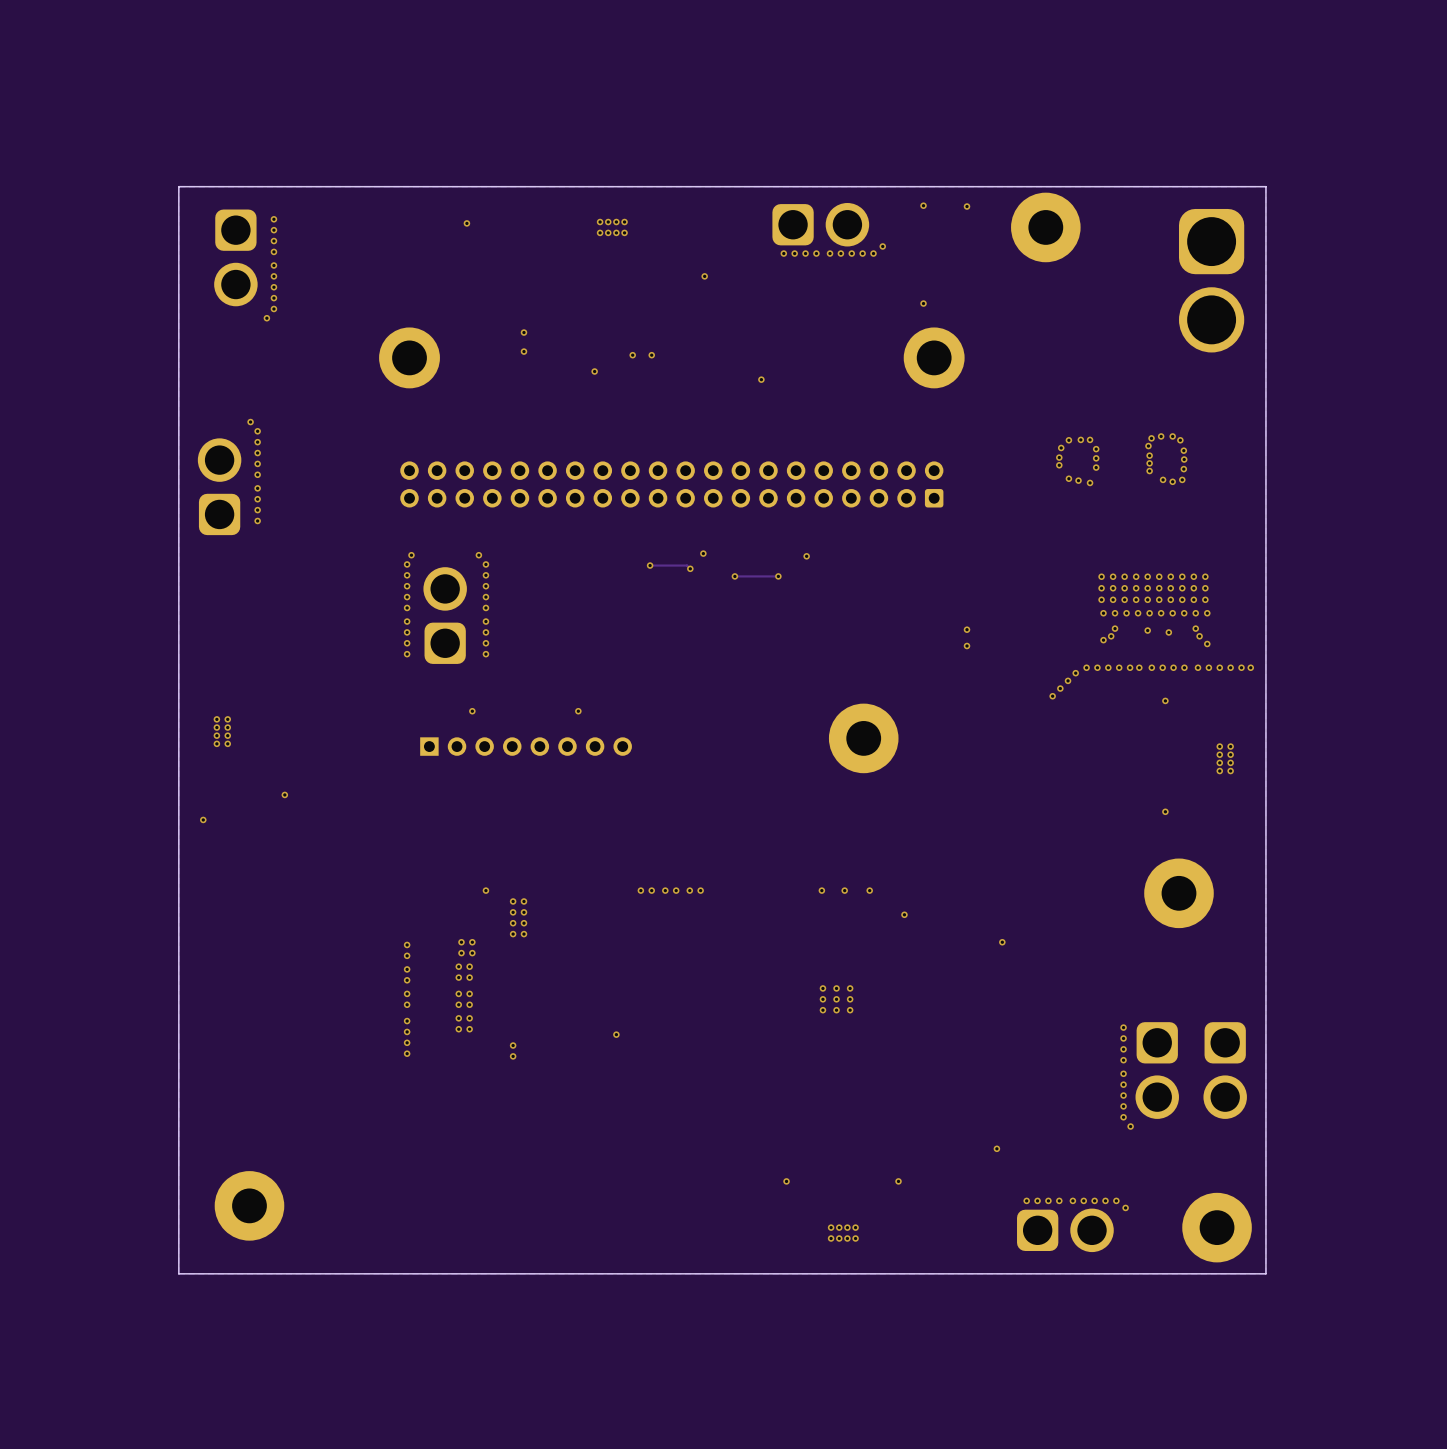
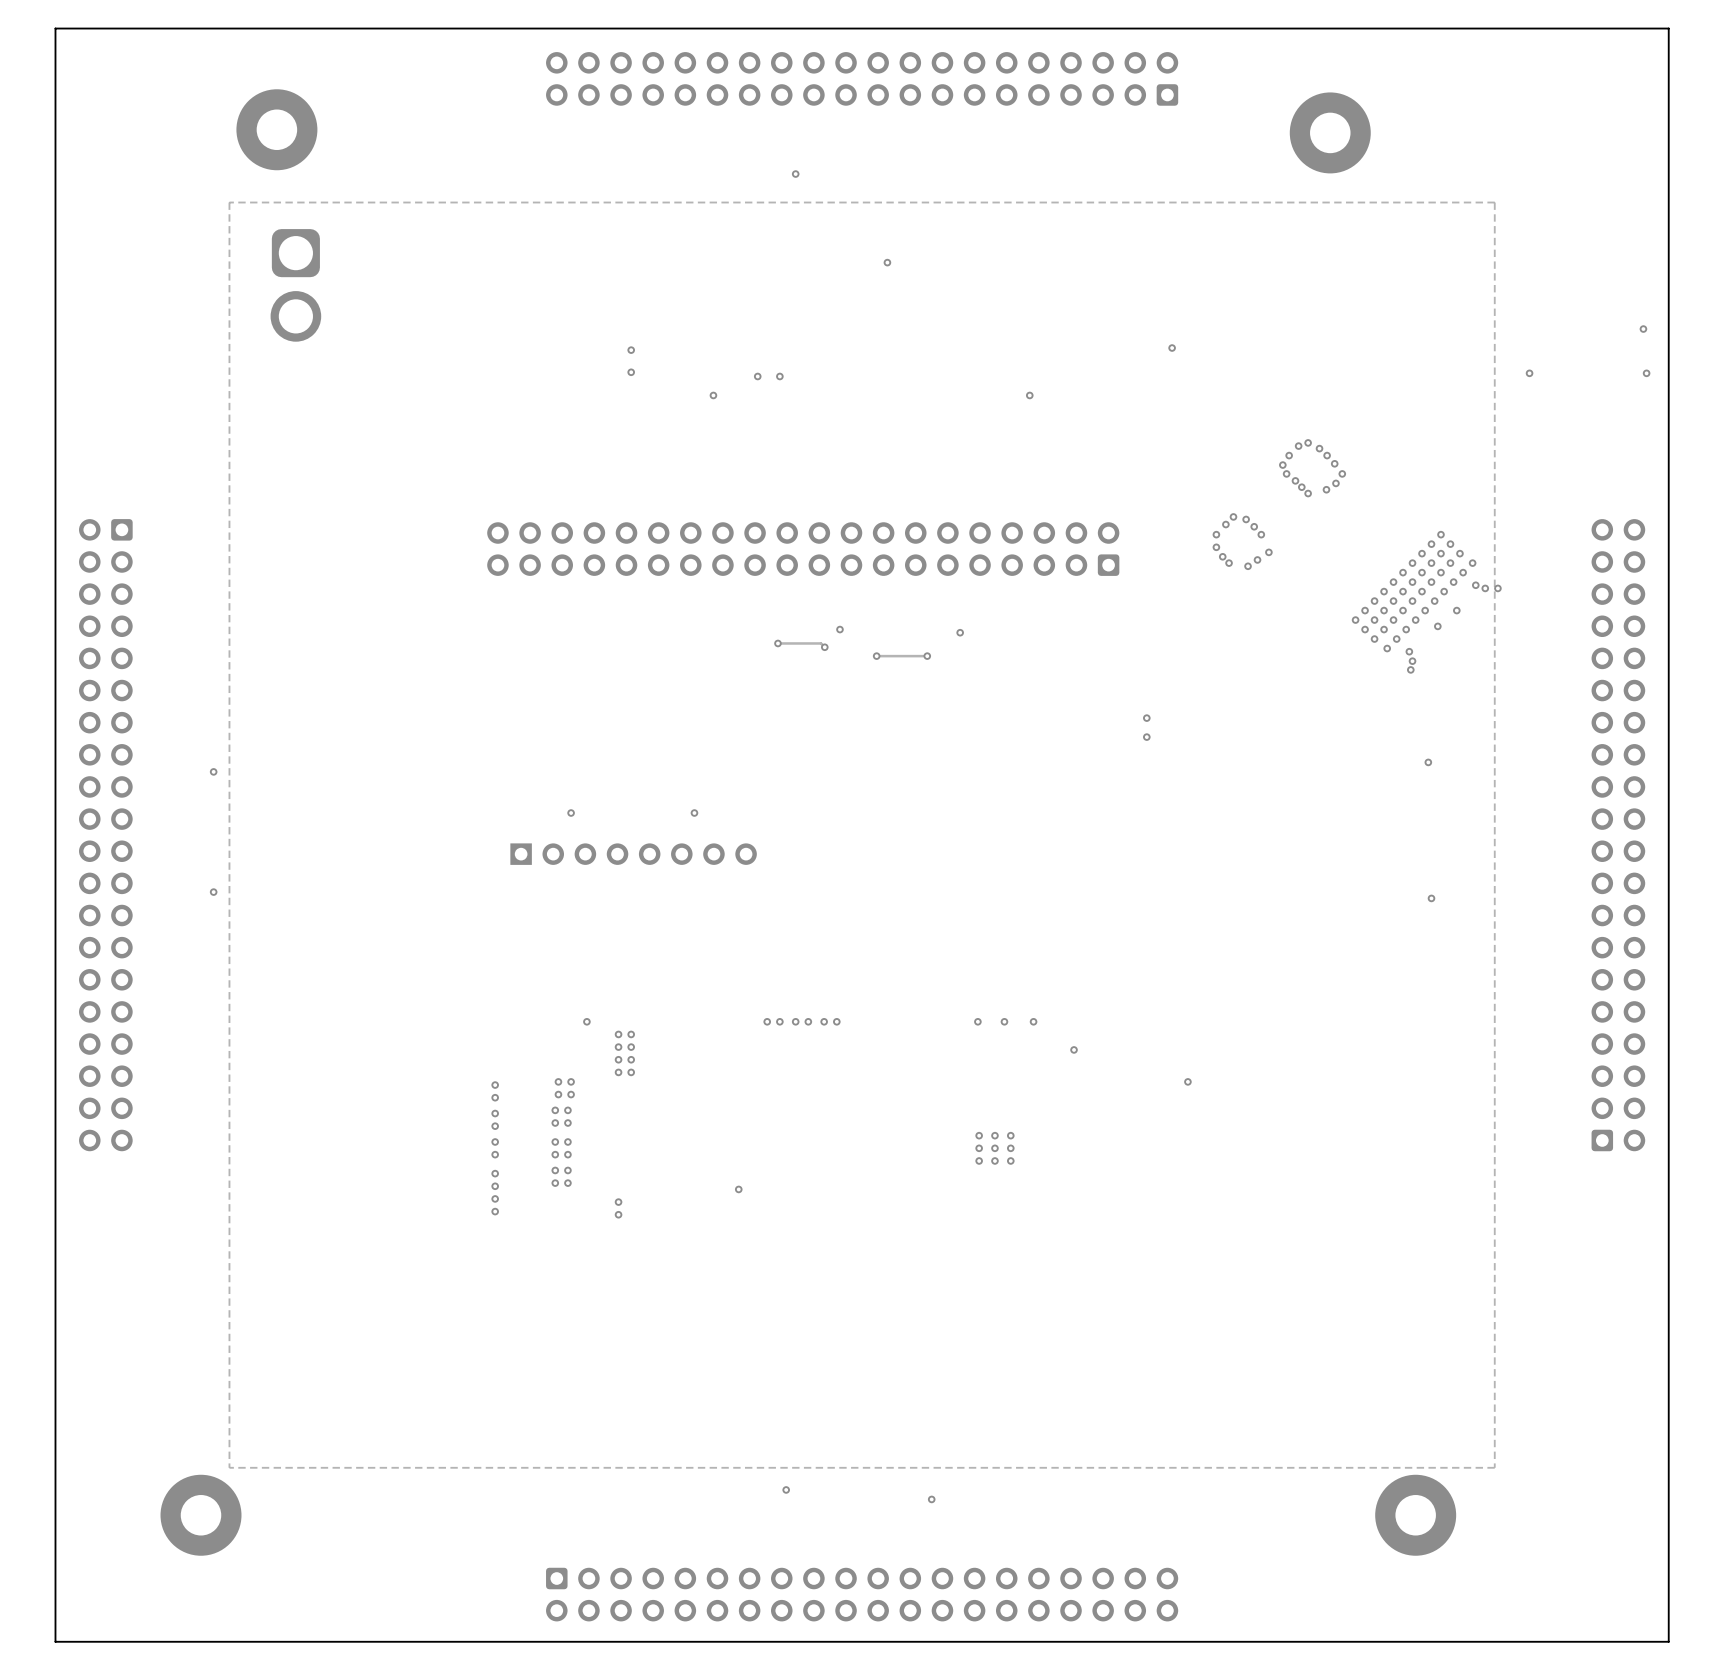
part: none -> (862, 78)
part: none -> (276, 129)
via: none -> (795, 174)
board edge: (1265, 186) (178, 186) (178, 1273) (1265, 1273) (1265, 186) -> (1668, 28) (1668, 1641) (55, 1641) (55, 28) (1668, 28)
via: (923, 205) -> none
via: (967, 206) -> none
via: (273, 219) -> none
via: (600, 222) -> none
via: (608, 222) -> none
via: (616, 222) -> none
via: (624, 222) -> none
via: (466, 223) -> none
part: (820, 224) -> none
part position: (1045, 227) -> (1330, 132)
via: (273, 230) -> none
via: (600, 232) -> none
via: (608, 232) -> none
via: (616, 232) -> none
via: (624, 232) -> none
via: none -> (887, 262)
via: (273, 241) -> none
via: (882, 246) -> none
via: (273, 251) -> none
via: (783, 253) -> none
via: (794, 253) -> none
via: (805, 253) -> none
via: (816, 253) -> none
via: (830, 253) -> none
via: (840, 253) -> none
via: (851, 253) -> none
via: (862, 253) -> none
via: (873, 253) -> none
via: (273, 265) -> none
via: (273, 276) -> none
via: (704, 276) -> none
part: (1211, 280) -> none
via: (273, 287) -> none
via: none -> (1643, 329)
via: (273, 298) -> none
via: (923, 303) -> none
via: (273, 308) -> none
via: none -> (1172, 348)
via: none -> (631, 350)
via: (266, 318) -> none
via: none -> (1529, 373)
via: none -> (1646, 373)
via: none -> (757, 376)
via: none -> (779, 376)
via: (523, 351) -> none
via: none -> (713, 395)
via: none -> (1029, 395)
via: (632, 355) -> none
via: (651, 355) -> none
part: (409, 357) -> none
part: (934, 357) -> none
via: (594, 371) -> none
via: (761, 379) -> none
via: none -> (1308, 442)
via: none -> (1298, 446)
via: none -> (1319, 448)
via: none -> (1289, 455)
via: none -> (1327, 455)
via: none -> (1334, 463)
via: none -> (1282, 465)
via: none -> (1286, 473)
via: none -> (1342, 473)
via: (250, 422) -> none
via: none -> (1295, 480)
via: none -> (1335, 483)
via: (257, 431) -> none
via: none -> (1301, 487)
via: none -> (1326, 489)
via: none -> (1308, 493)
via: (1161, 436) -> none
via: (1172, 436) -> none
via: (1151, 438) -> none
via: (1080, 439) -> none
via: (1090, 439) -> none
via: (1068, 440) -> none
via: (1180, 440) -> none
via: (257, 442) -> none
via: (1148, 446) -> none
via: (1061, 447) -> none
via: (1096, 449) -> none
via: (1183, 450) -> none
via: (257, 453) -> none
via: (1149, 455) -> none
via: none -> (1233, 516)
via: (1059, 457) -> none
via: (1096, 458) -> none
via: none -> (1246, 519)
via: (1184, 459) -> none
via: (257, 463) -> none
via: none -> (1225, 524)
via: (1149, 463) -> none
via: (1096, 467) -> none
via: (1183, 469) -> none
via: (1149, 471) -> none
via: none -> (1216, 534)
via: none -> (1261, 534)
via: none -> (1440, 534)
via: (257, 474) -> none
via: (1068, 478) -> none
via: (1163, 479) -> none
via: (1182, 479) -> none
via: (1078, 480) -> none
via: none -> (1431, 544)
via: none -> (1450, 544)
via: (1172, 481) -> none
via: none -> (1216, 547)
via: (1090, 482) -> none
part: (219, 486) -> none
via: none -> (1268, 552)
via: (257, 488) -> none
via: none -> (1422, 553)
via: none -> (1440, 553)
via: none -> (1459, 553)
via: none -> (1222, 556)
via: none -> (1257, 559)
via: none -> (1229, 563)
via: none -> (1412, 563)
via: none -> (1431, 563)
via: none -> (1450, 563)
via: none -> (1472, 563)
via: (257, 499) -> none
via: none -> (1248, 566)
via: none -> (1403, 572)
via: none -> (1422, 572)
via: none -> (1440, 572)
via: none -> (1463, 572)
via: (257, 510) -> none
via: none -> (1393, 582)
via: none -> (1412, 582)
via: none -> (1431, 582)
via: none -> (1453, 582)
via: none -> (1475, 585)
via: none -> (1485, 588)
via: none -> (1497, 588)
via: (257, 520) -> none
via: none -> (1384, 591)
via: none -> (1403, 591)
via: none -> (1422, 591)
via: none -> (1444, 591)
via: none -> (1374, 601)
via: none -> (1393, 601)
via: none -> (1412, 601)
via: none -> (1434, 601)
via: none -> (1365, 610)
via: none -> (1384, 610)
via: none -> (1403, 610)
via: none -> (1425, 610)
via: none -> (1456, 610)
via: none -> (1355, 620)
via: none -> (1374, 620)
via: none -> (1393, 620)
via: none -> (1415, 620)
via: none -> (1437, 626)
via: none -> (1365, 629)
via: none -> (1384, 629)
via: none -> (1406, 629)
via: (411, 555) -> none
via: (478, 555) -> none
via: none -> (1374, 639)
via: none -> (1396, 639)
via: (407, 564) -> none
via: (485, 564) -> none
via: none -> (1387, 648)
via: none -> (1409, 651)
via: (407, 575) -> none
via: (485, 575) -> none
via: (1101, 576) -> none
via: (1113, 576) -> none
via: (1124, 576) -> none
via: (1136, 576) -> none
via: (1147, 576) -> none
via: (1159, 576) -> none
via: (1170, 576) -> none
via: (1182, 576) -> none
via: (1193, 576) -> none
via: (1205, 576) -> none
via: none -> (1412, 661)
via: (407, 586) -> none
via: (485, 586) -> none
via: (1101, 588) -> none
via: (1113, 588) -> none
via: (1124, 588) -> none
via: (1136, 588) -> none
via: (1147, 588) -> none
via: (1159, 588) -> none
via: (1170, 588) -> none
via: (1182, 588) -> none
via: (1205, 588) -> none
via: (407, 597) -> none
via: (485, 597) -> none
via: (1101, 599) -> none
via: (1113, 599) -> none
via: (1124, 599) -> none
via: (1136, 599) -> none
via: (1147, 599) -> none
via: (1159, 599) -> none
via: (1170, 599) -> none
via: (1182, 599) -> none
via: (1193, 599) -> none
via: (1205, 599) -> none
via: (407, 607) -> none
via: (485, 607) -> none
via: (1103, 613) -> none
via: (1115, 613) -> none
via: (1126, 613) -> none
via: (1138, 613) -> none
via: (1149, 613) -> none
via: (1161, 613) -> none
via: (1172, 613) -> none
via: (1184, 613) -> none
via: (1195, 613) -> none
via: (1207, 613) -> none
part: (445, 615) -> none
via: (407, 621) -> none
via: (485, 621) -> none
via: (1115, 628) -> none
via: (1195, 628) -> none
via: (1147, 630) -> none
via: (407, 632) -> none
via: (485, 632) -> none
via: (1168, 632) -> none
via: (1111, 636) -> none
via: (1199, 636) -> none
via: (1103, 640) -> none
via: (407, 643) -> none
via: (485, 643) -> none
via: (1207, 644) -> none
via: (407, 654) -> none
via: (485, 654) -> none
via: (1086, 667) -> none
via: (1097, 667) -> none
via: (1108, 667) -> none
via: (1119, 667) -> none
via: (1130, 667) -> none
via: (1139, 667) -> none
via: (1151, 667) -> none
via: (1162, 667) -> none
via: (1173, 667) -> none
via: (1184, 667) -> none
via: (1198, 667) -> none
via: (1219, 667) -> none
via: (1230, 667) -> none
via: (1241, 667) -> none
via: (1250, 667) -> none
via: (1075, 673) -> none
via: none -> (213, 771)
via: (1068, 680) -> none
via: (1060, 688) -> none
via: (1052, 696) -> none
via: (1165, 700) -> none
via: (216, 719) -> none
via: (227, 719) -> none
via: (216, 727) -> none
via: (227, 727) -> none
part: none -> (105, 835)
part: none -> (1618, 835)
via: (216, 735) -> none
via: (227, 735) -> none
part: (863, 738) -> none
via: (216, 743) -> none
via: (227, 743) -> none
via: (1219, 746) -> none
via: (1230, 746) -> none
via: (1219, 754) -> none
via: (1230, 754) -> none
via: (1219, 762) -> none
via: (1230, 762) -> none
via: (1219, 771) -> none
via: (1230, 771) -> none
via: none -> (213, 892)
via: none -> (1431, 898)
via: (284, 794) -> none
via: (1165, 811) -> none
via: (203, 819) -> none
part: (1178, 893) -> none
via: (1123, 1027) -> none
via: (1123, 1038) -> none
via: (1123, 1049) -> none
via: (1123, 1060) -> none
part: (1157, 1070) -> none
part: (1225, 1070) -> none
via: (1123, 1073) -> none
via: (1123, 1084) -> none
via: (1123, 1095) -> none
via: (1123, 1106) -> none
via: (1123, 1117) -> none
via: (1130, 1126) -> none
via: (996, 1148) -> none
via: (786, 1181) -> none
via: (898, 1181) -> none
via: (1026, 1200) -> none
via: (1037, 1200) -> none
via: (1048, 1200) -> none
via: (1059, 1200) -> none
via: (1072, 1200) -> none
via: (1083, 1200) -> none
via: (1094, 1200) -> none
via: (1105, 1200) -> none
via: (1116, 1200) -> none
part position: (249, 1205) -> (200, 1515)
via: (1125, 1207) -> none
via: (831, 1227) -> none
via: (839, 1227) -> none
via: (847, 1227) -> none
via: (855, 1227) -> none
part position: (1217, 1227) -> (1415, 1515)
part: (1065, 1230) -> none
via: (831, 1238) -> none
via: (839, 1238) -> none
via: (847, 1238) -> none
via: (855, 1238) -> none
via: none -> (786, 1489)
via: none -> (931, 1499)
part: none -> (862, 1594)

